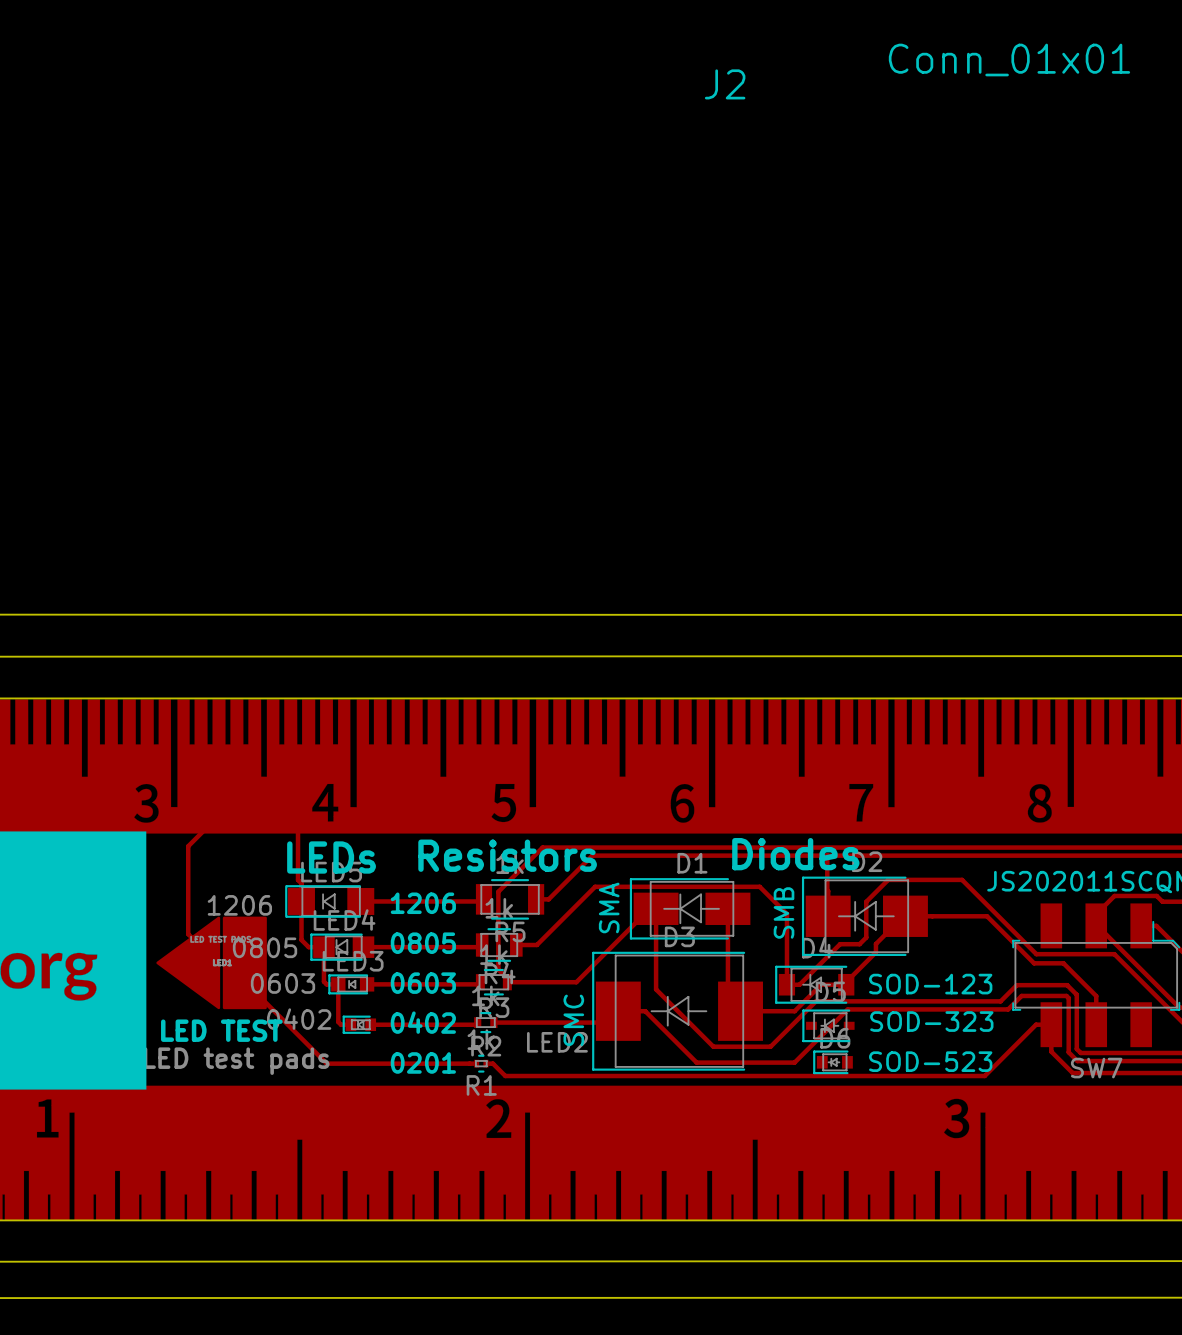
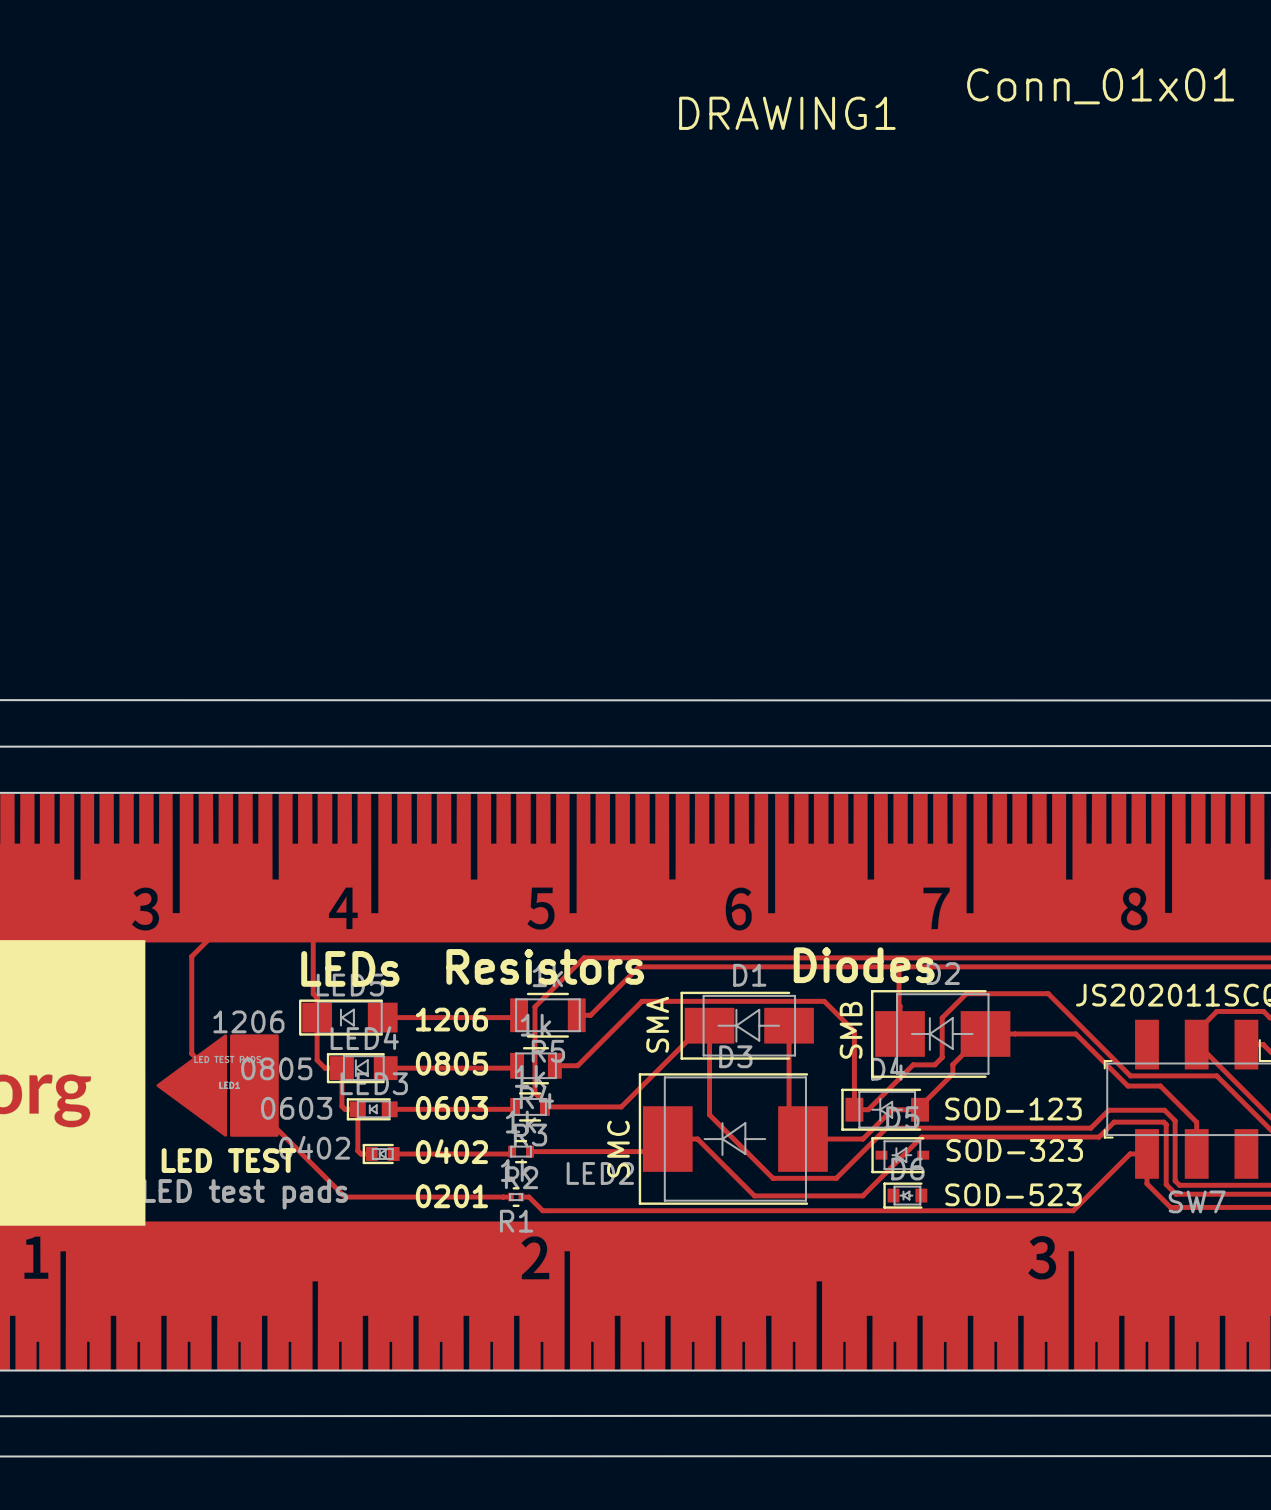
J2 name: J2 (725, 84) -> DRAWING1 (787, 113)

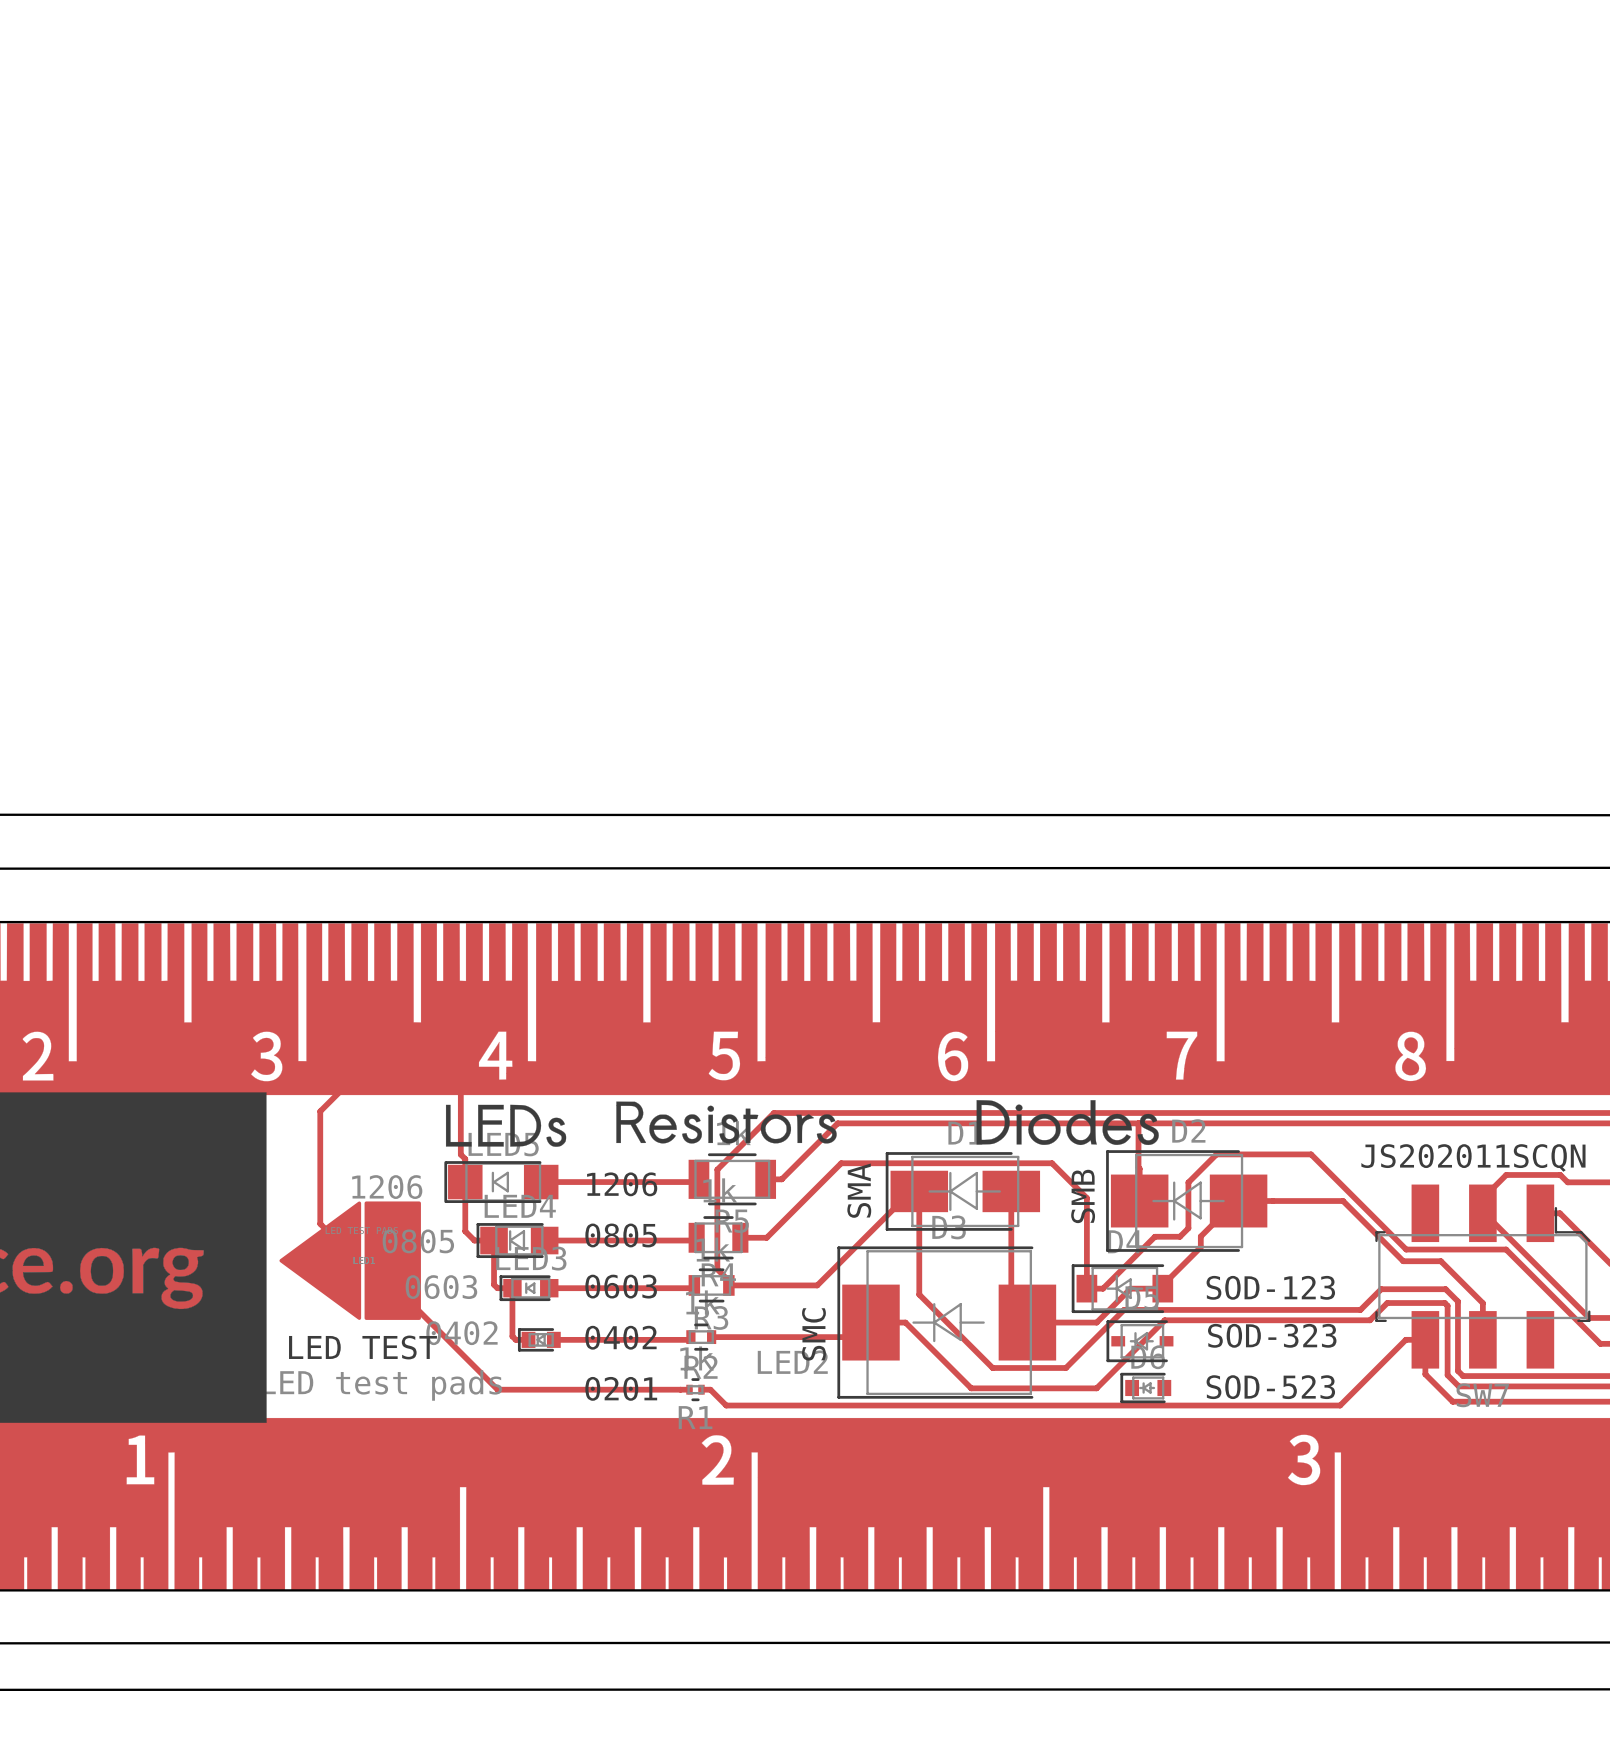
DRAWING1 value: Conn_01x01 (1100, 86) -> none
DRAWING1 name: DRAWING1 (787, 113) -> none
drawing: none -> [976, 1100, 1159, 1146]
drawing: none -> [616, 1101, 837, 1144]
drawing: none -> [445, 1104, 567, 1147]
text: Diodes (864, 965) -> none
text: Resistors (545, 966) -> none
text: LEDs (350, 968) -> none

